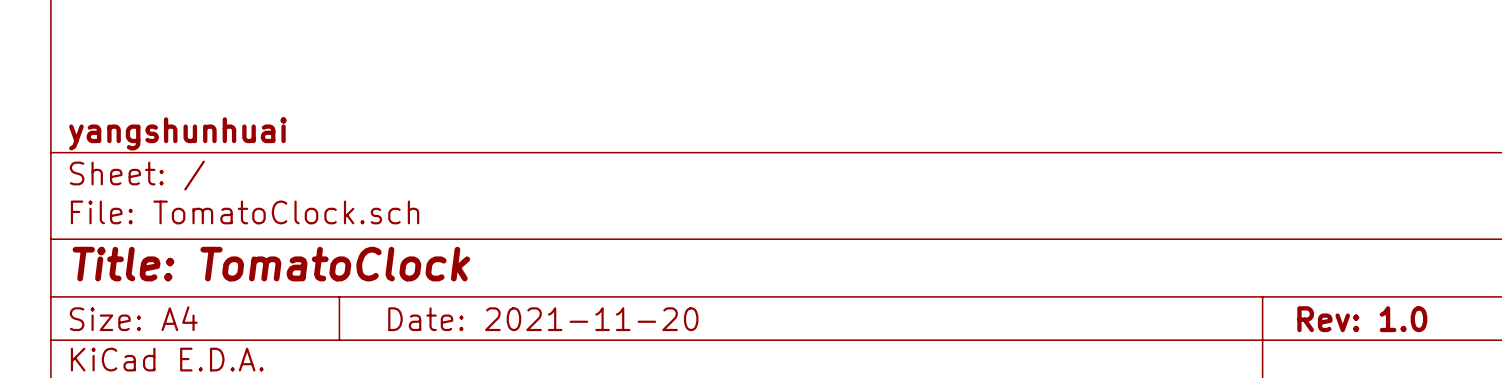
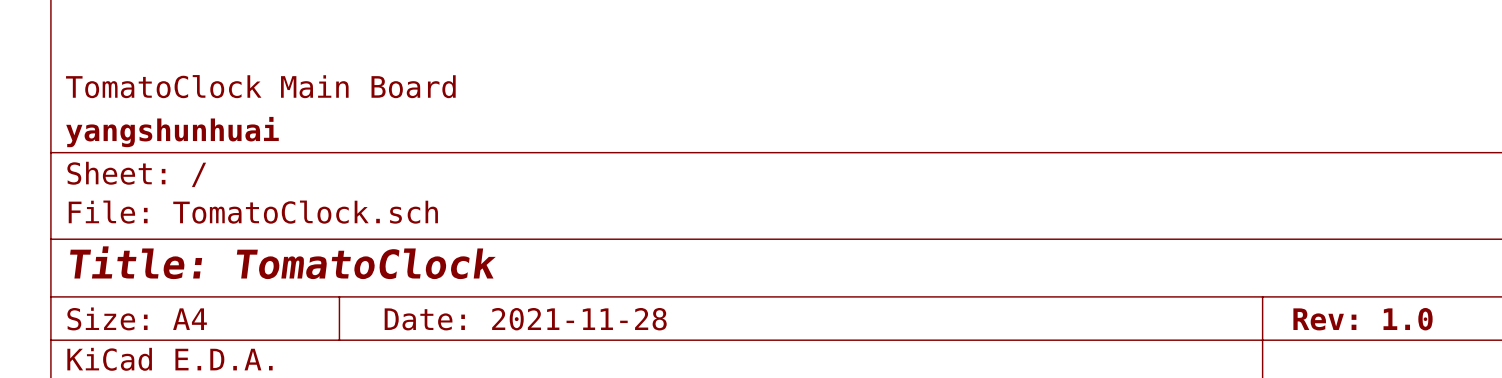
title block: none -> TomatoClock Main Board (260, 86)
title block: Date: 2021-11-20 (543, 319) -> Date: 2021-11-28 (525, 319)

